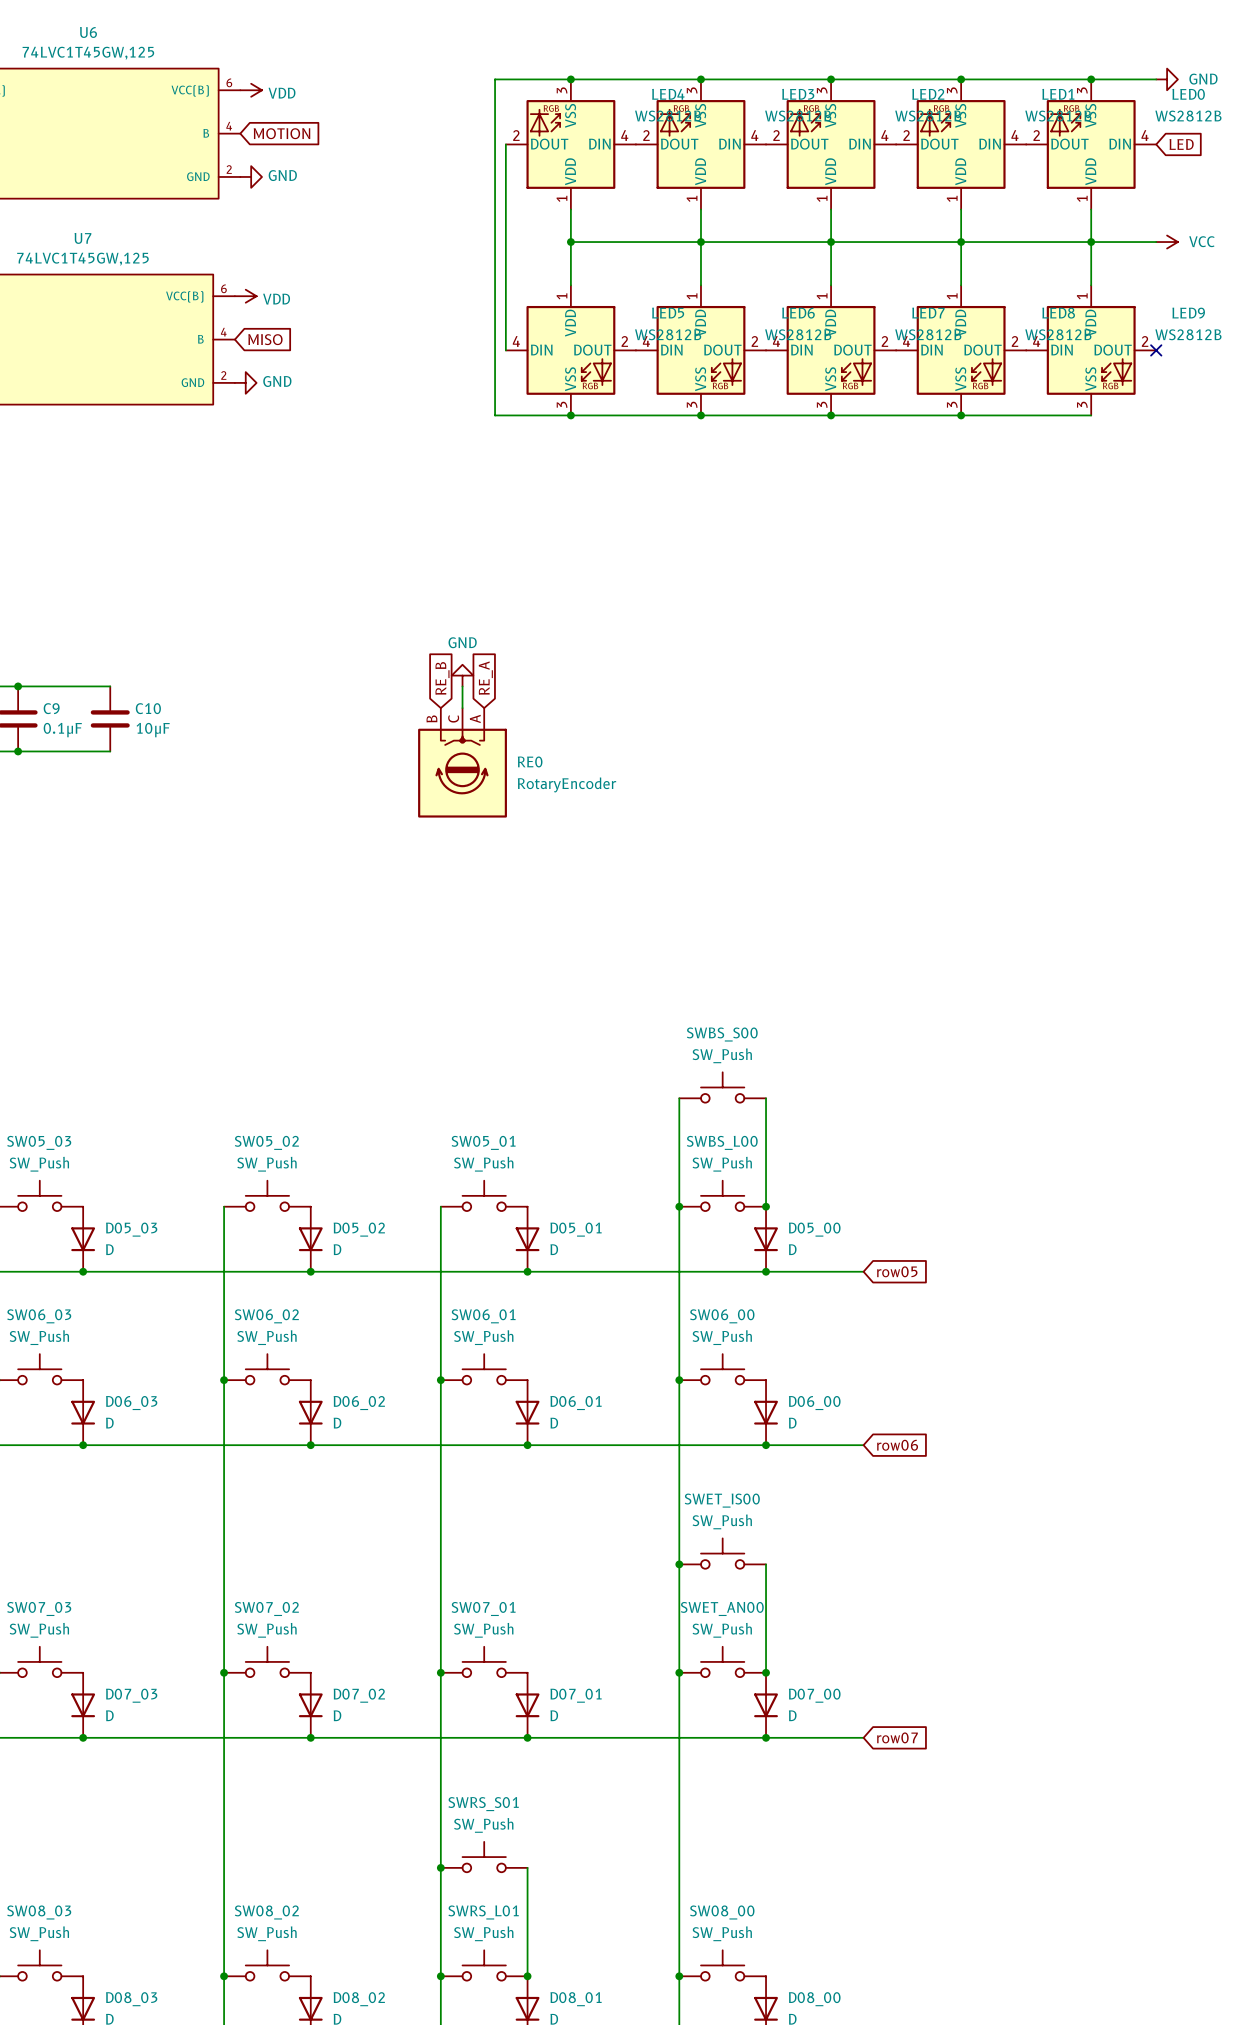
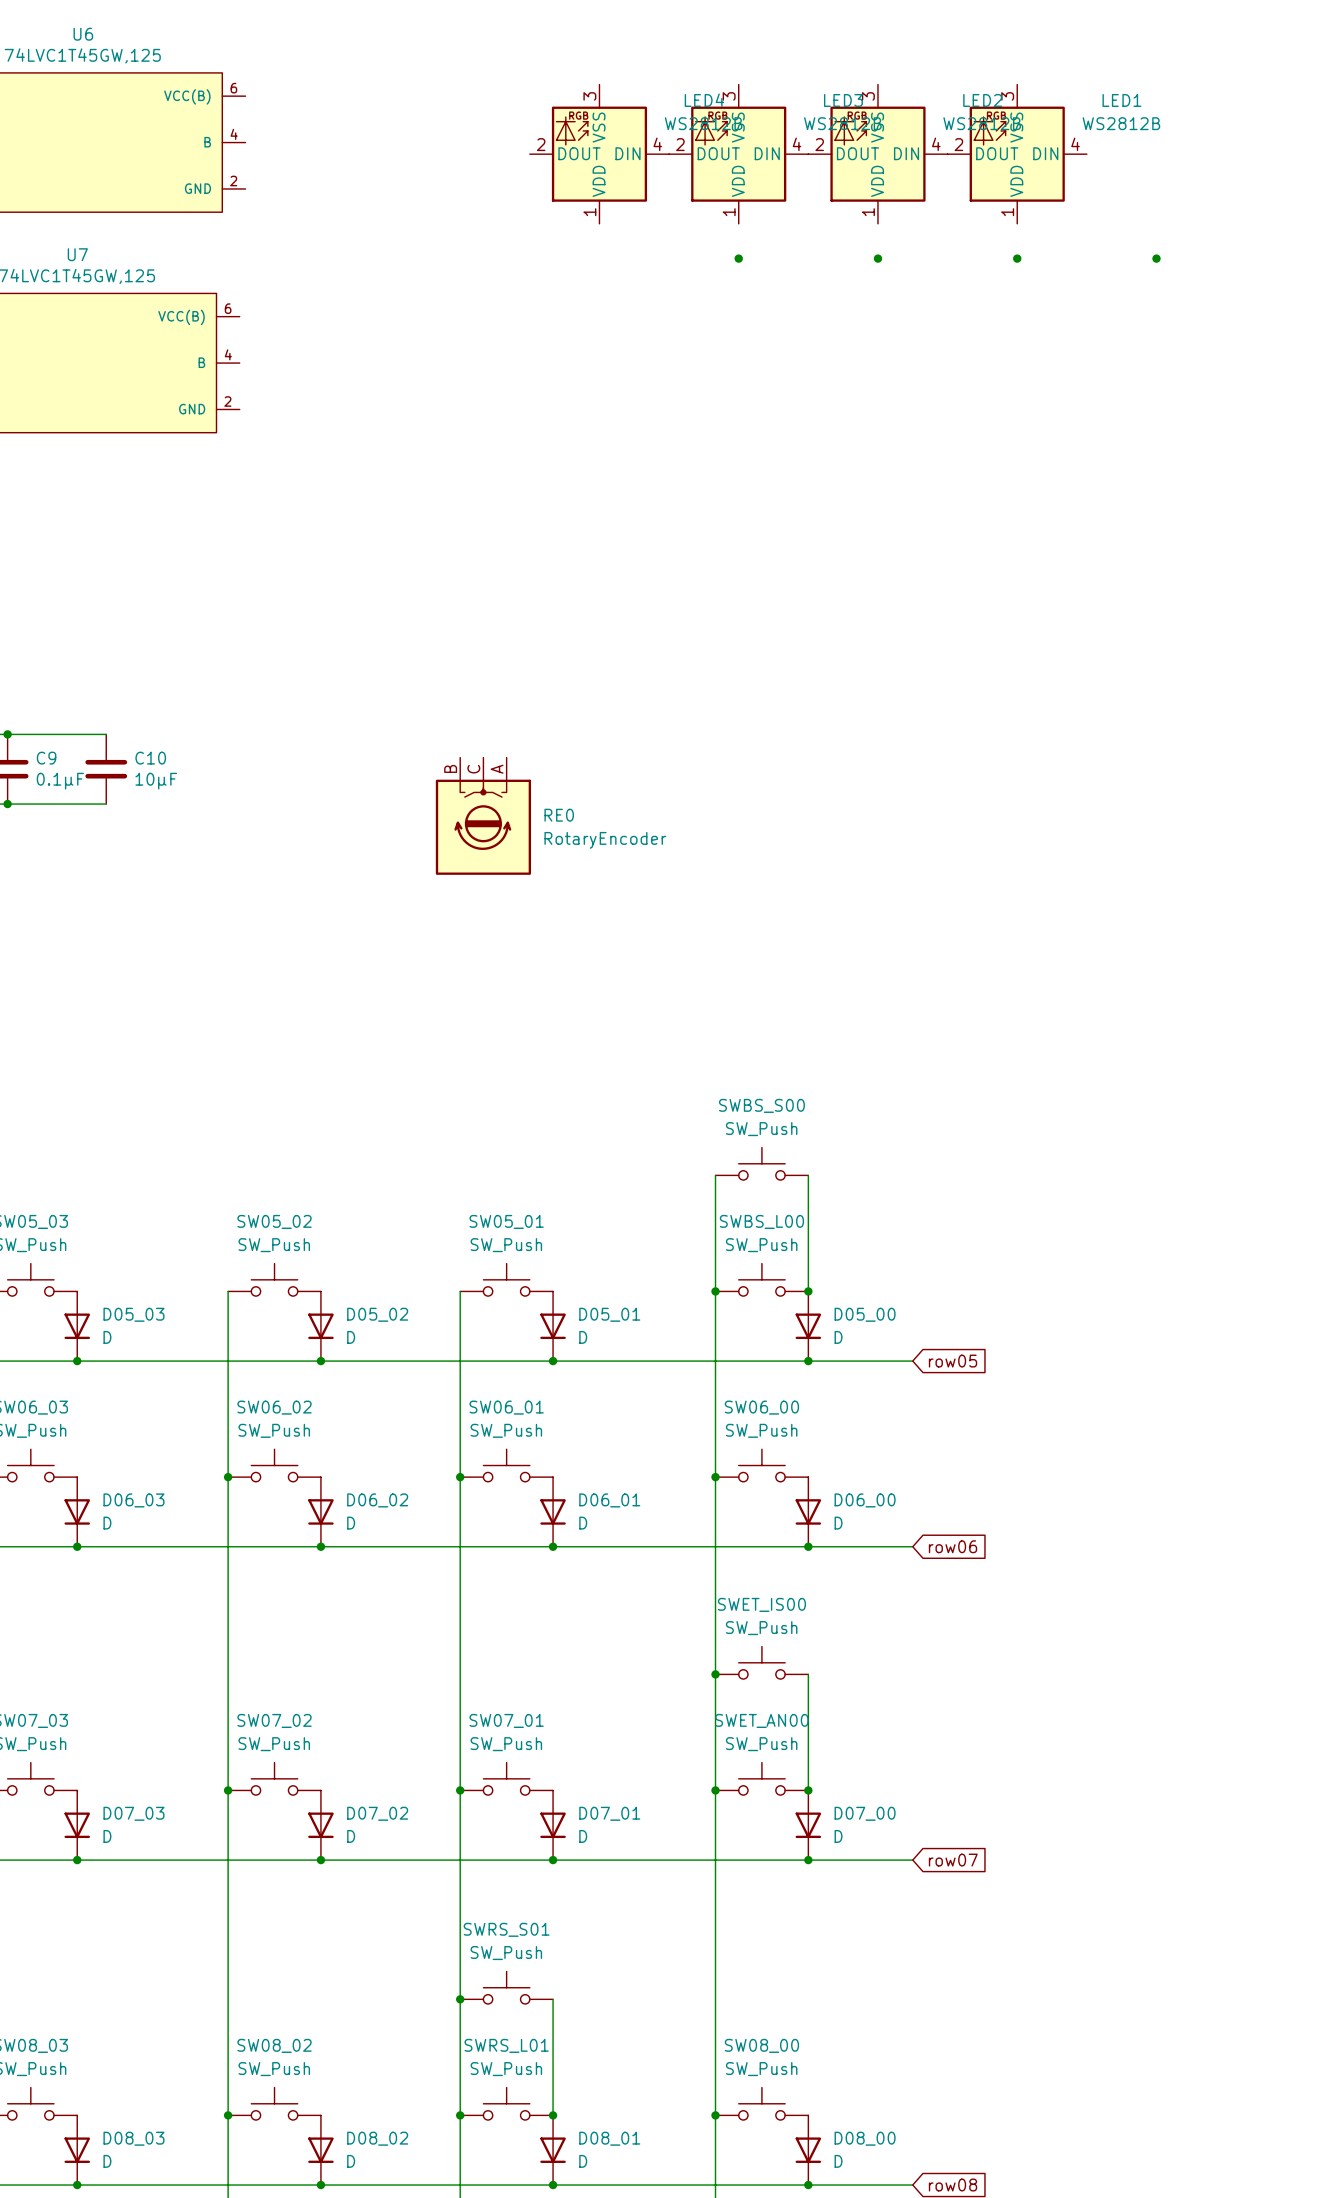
junction: (570, 79) -> none
junction: (700, 79) -> none
junction: (831, 79) -> none
junction: (961, 79) -> none
junction: (1091, 79) -> none
wire: (1156, 79) (495, 79) (495, 415) (1091, 415) -> none
power symbol: GND (1167, 79) -> none
power symbol: VDD (251, 90) -> none
global label: MOTION (281, 133) -> none
wire: (505, 144) (505, 350) -> none
LED0: WS2812B (1091, 144) -> none
global label: LED (1181, 144) -> none
power symbol: GND (251, 176) -> none
wire: (570, 209) (570, 285) -> none
wire: (700, 209) (700, 285) -> none
wire: (831, 209) (831, 285) -> none
wire: (961, 209) (961, 285) -> none
wire: (1091, 209) (1091, 285) -> none
wire: (570, 242) (1156, 242) -> none
junction: (570, 242) -> none
power symbol: VCC (1167, 242) -> none
power symbol: VDD (245, 296) -> none
global label: MISO (265, 339) -> none
LED5: WS2812B (570, 350) -> none
LED6: WS2812B (700, 350) -> none
LED7: WS2812B (831, 350) -> none
LED8: WS2812B (961, 350) -> none
LED9: WS2812B (1091, 350) -> none
no-connect mark: (1156, 350) -> none
power symbol: GND (245, 382) -> none
junction: (570, 415) -> none
junction: (700, 415) -> none
junction: (831, 415) -> none
junction: (961, 415) -> none
power symbol: GND (462, 675) -> none
global label: RE_B (442, 678) -> none
global label: RE_A (485, 678) -> none
wire: (462, 686) (462, 708) -> none

